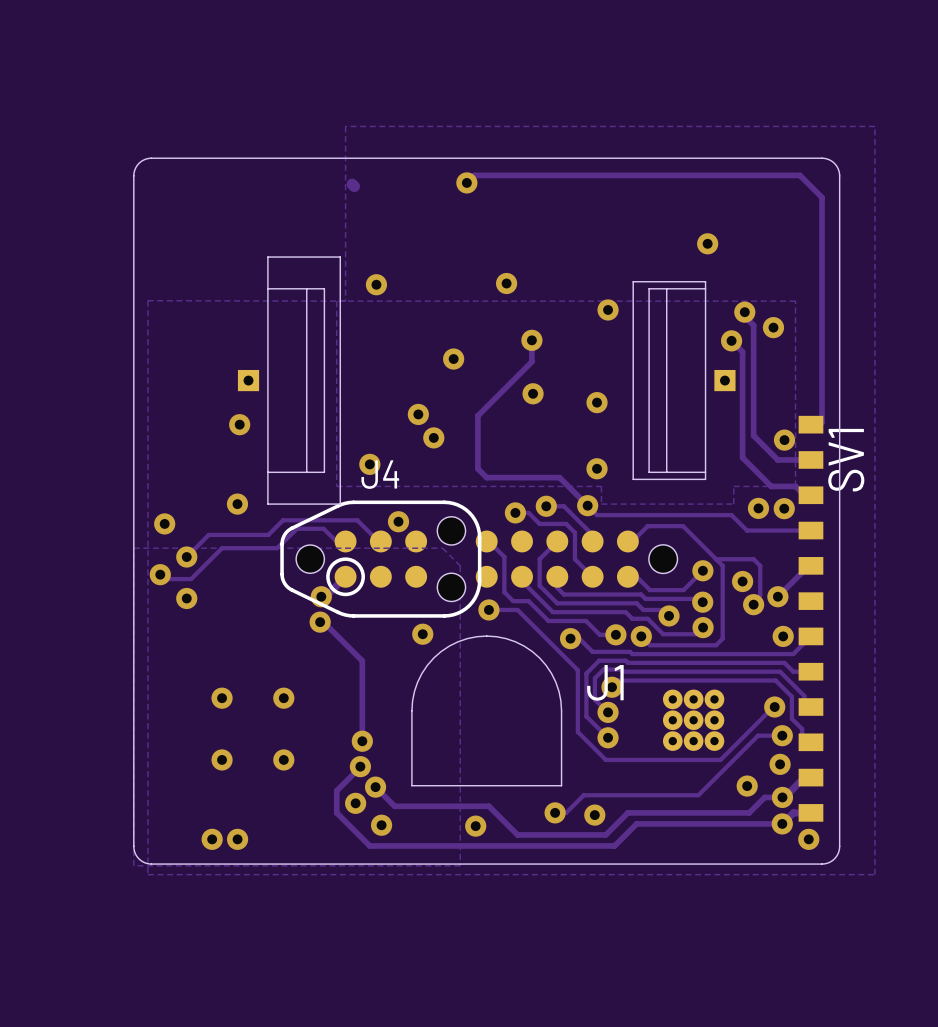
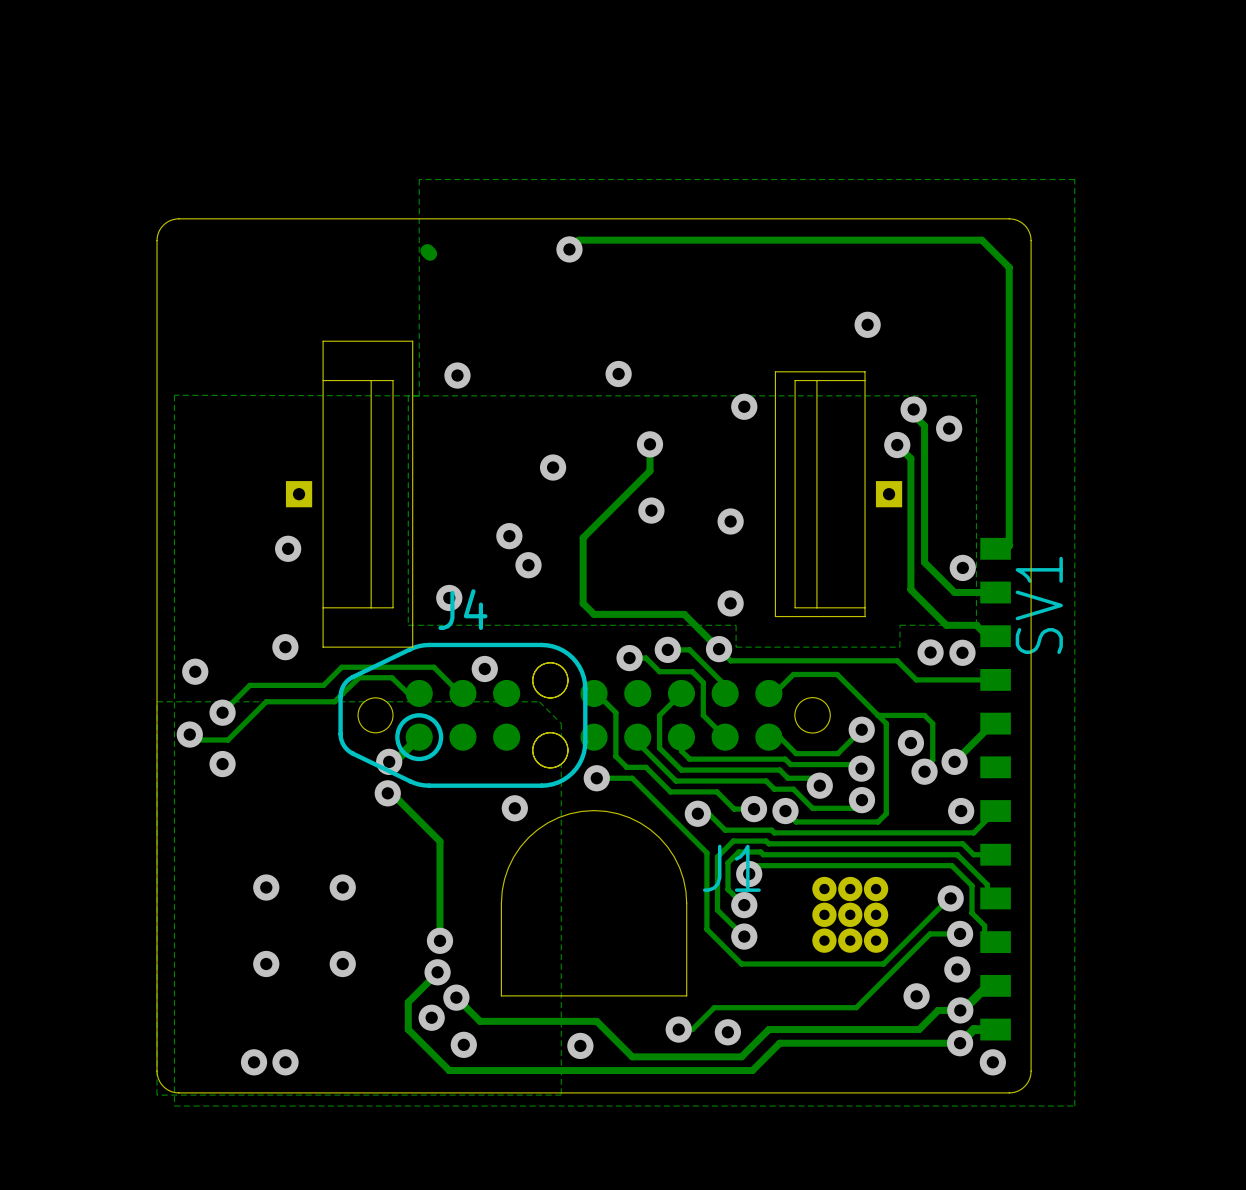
J1 footprint: [475, 530, 678, 588] -> [532, 662, 831, 768]

